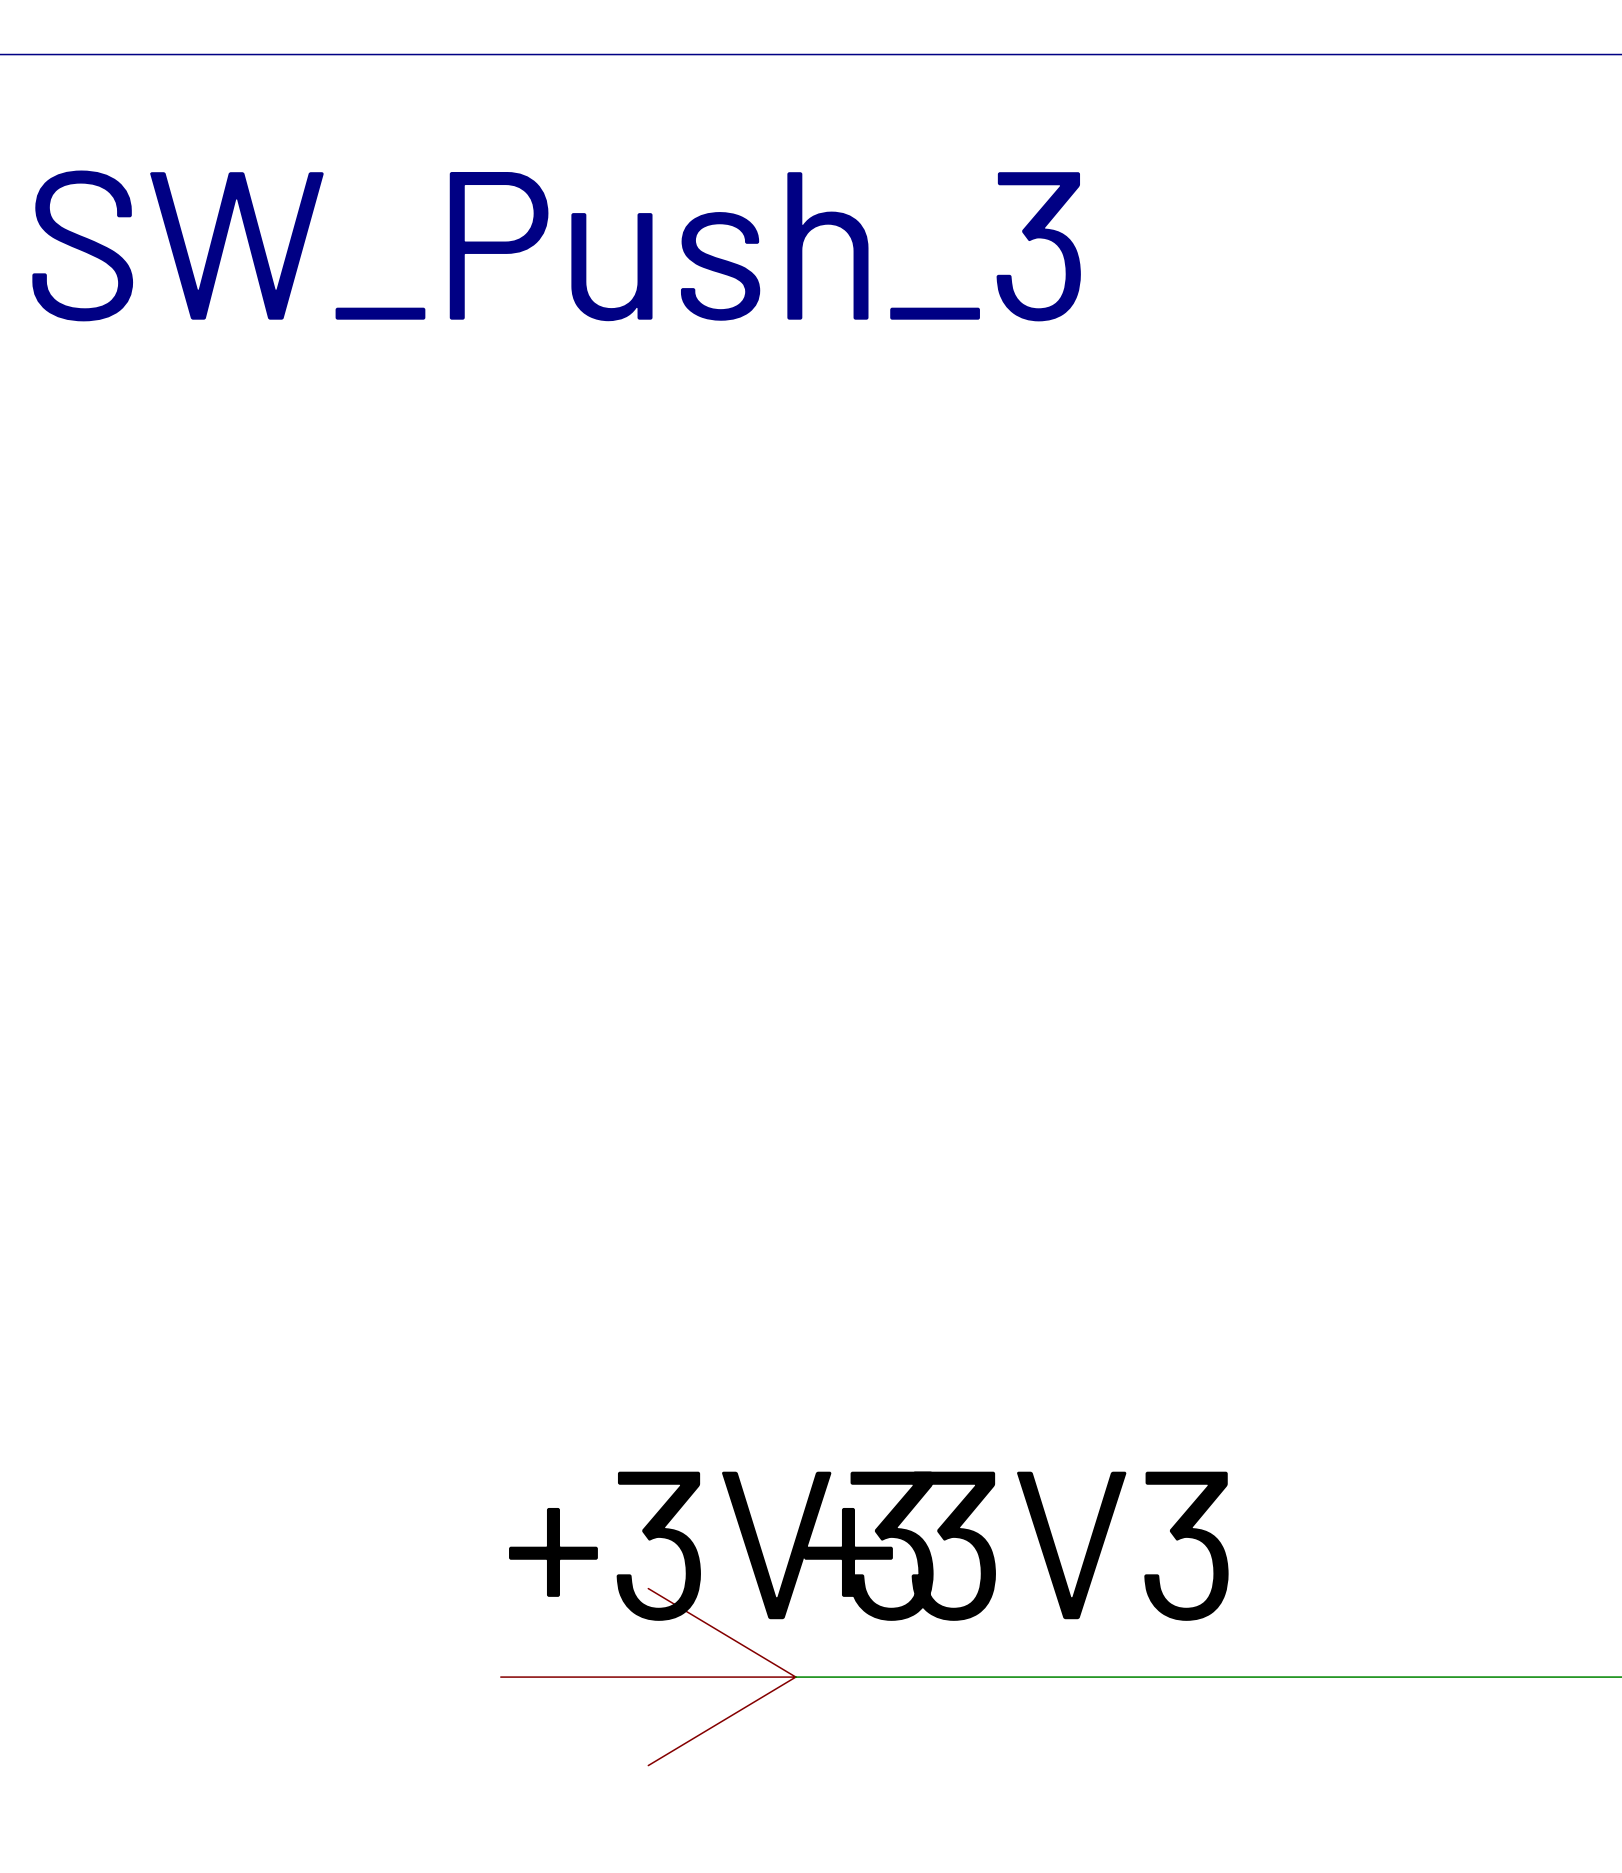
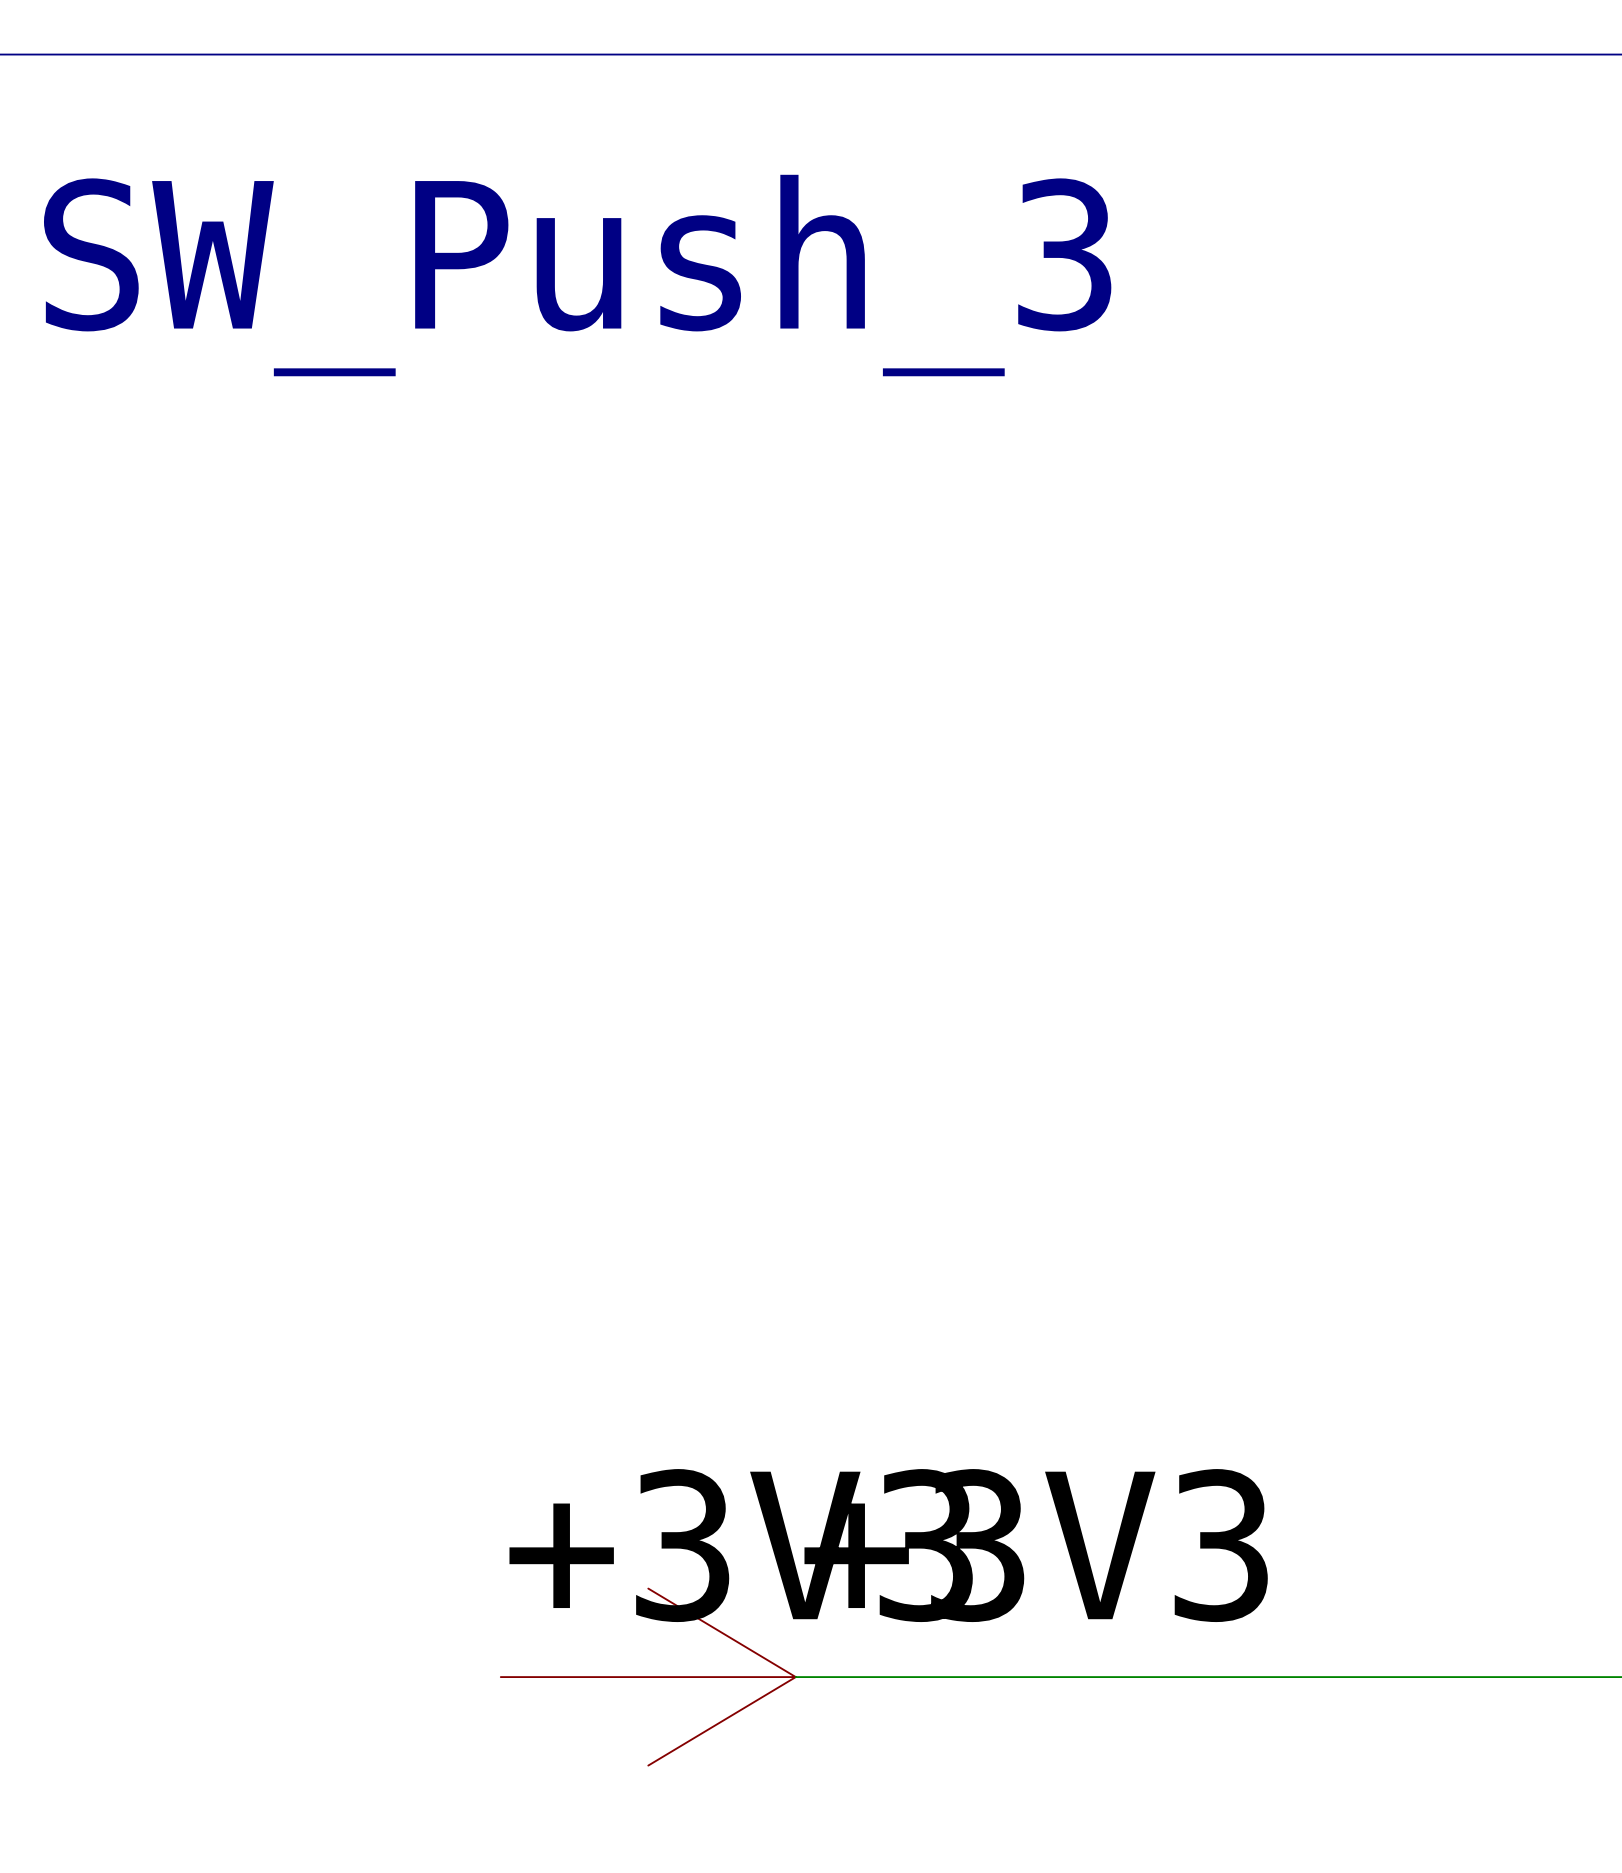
text position: SW_Push_3 (556, 245) -> SW_Push_3 (577, 275)

